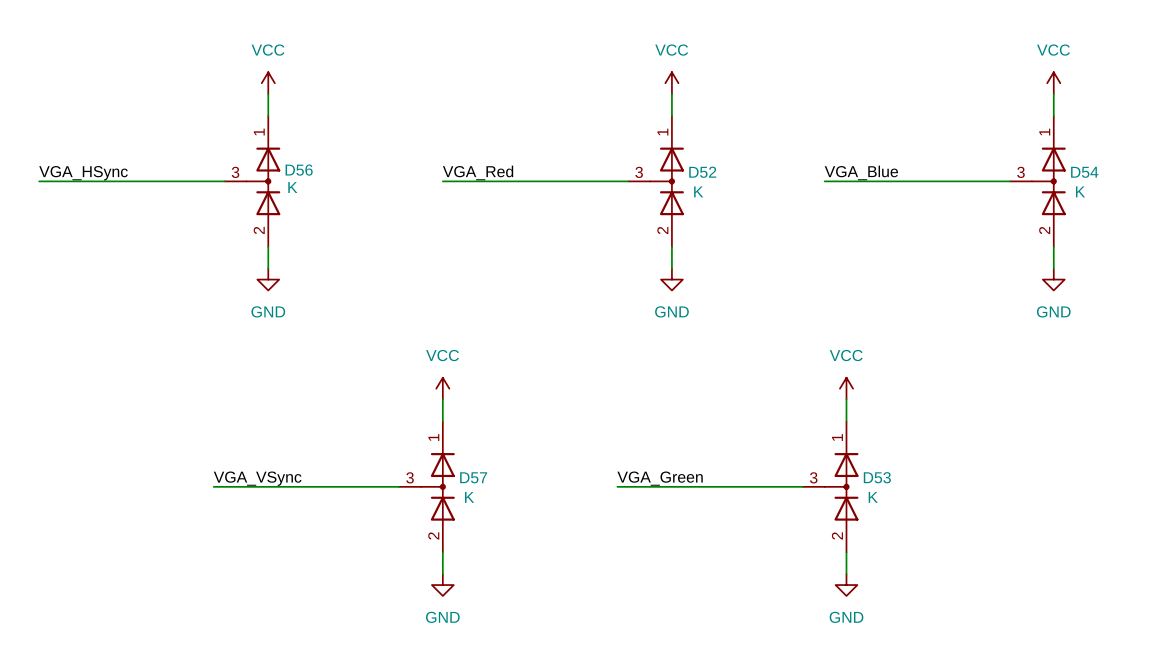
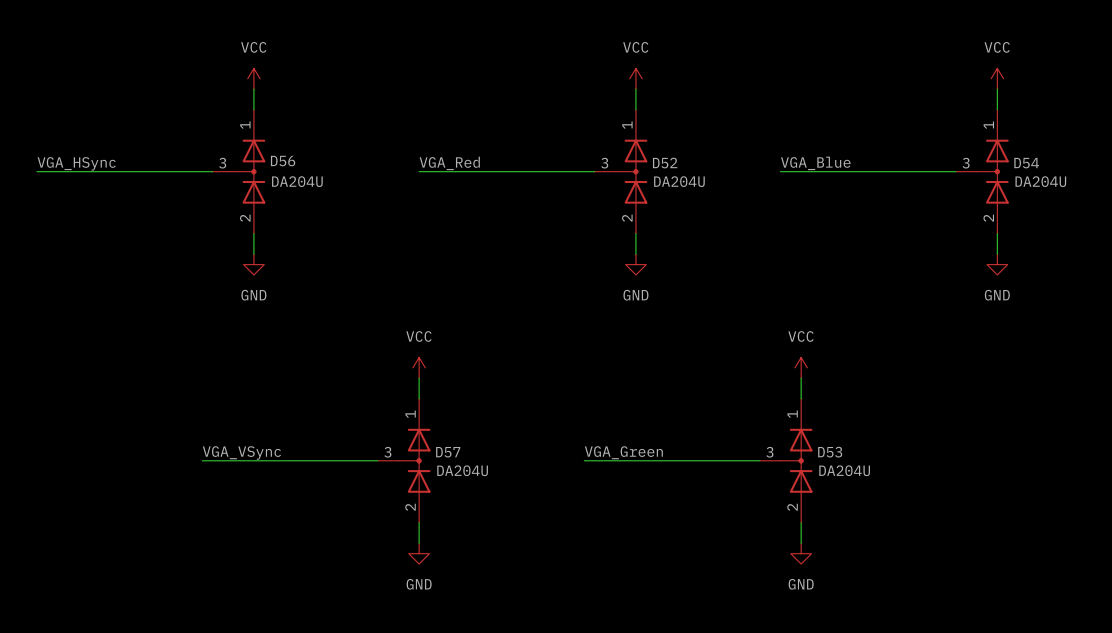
D56 value: K (292, 187) -> DA204U (297, 181)
D52 value: K (698, 191) -> DA204U (679, 181)
D54 value: K (1080, 191) -> DA204U (1040, 181)
D57 value: K (469, 497) -> DA204U (462, 470)
D53 value: K (873, 497) -> DA204U (844, 470)

